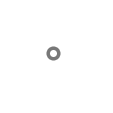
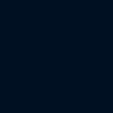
via: (53, 53) -> none

